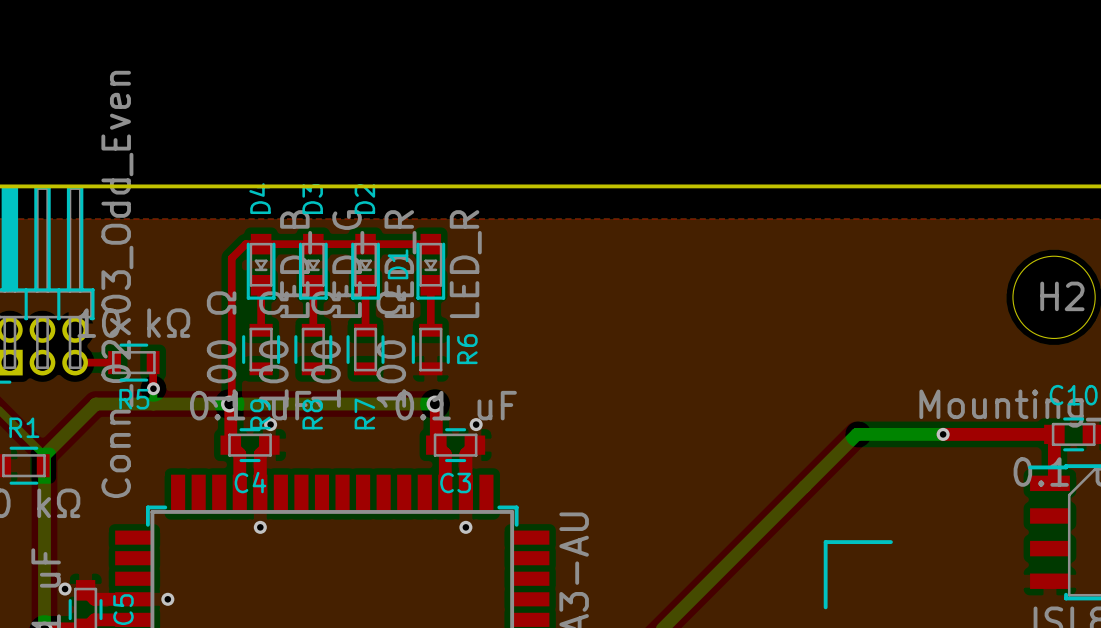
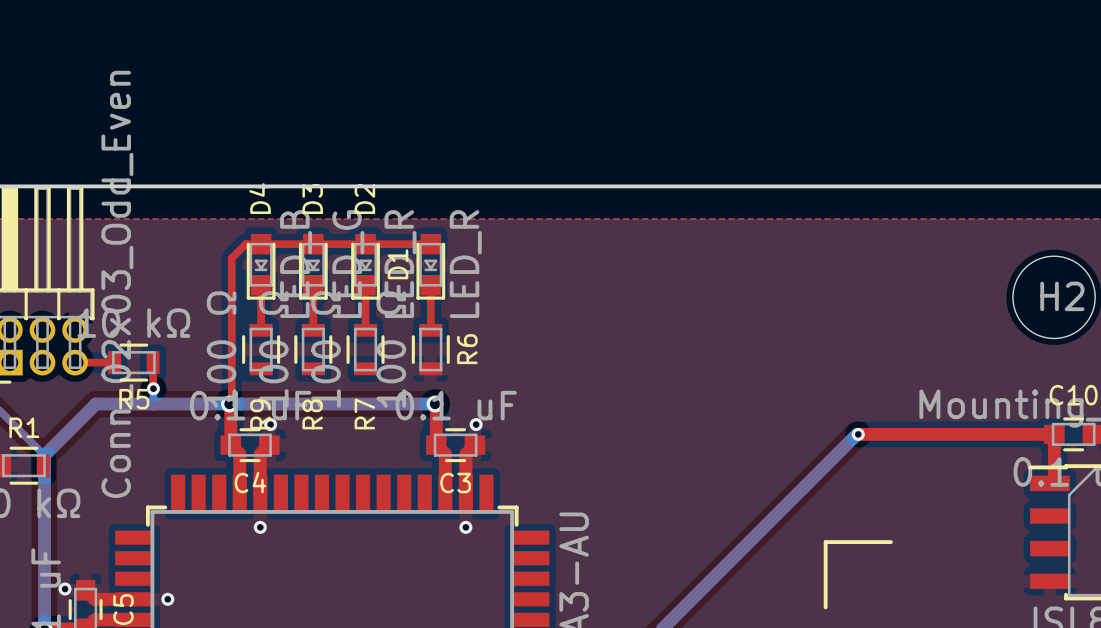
bottom track: (856, 434) (943, 434) -> none
top track: none -> (858, 434) (943, 434)
via position: (943, 434) -> (858, 434)

